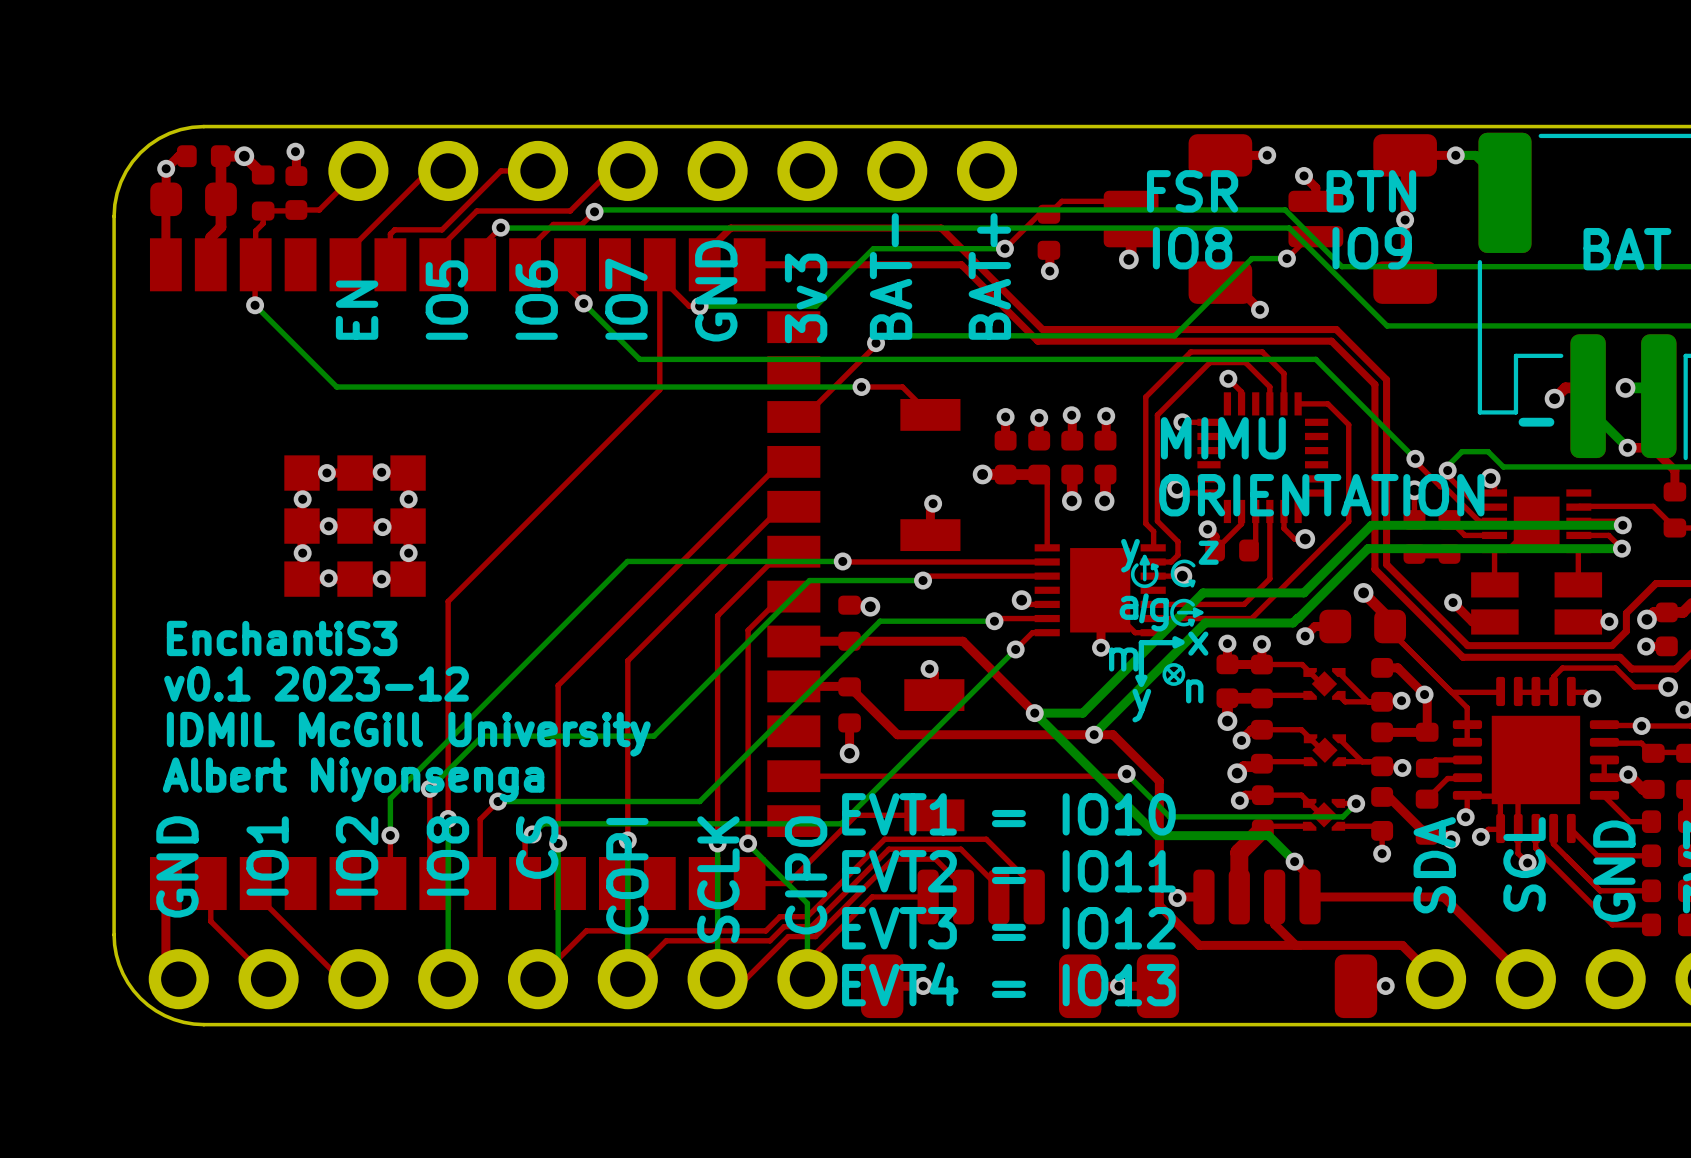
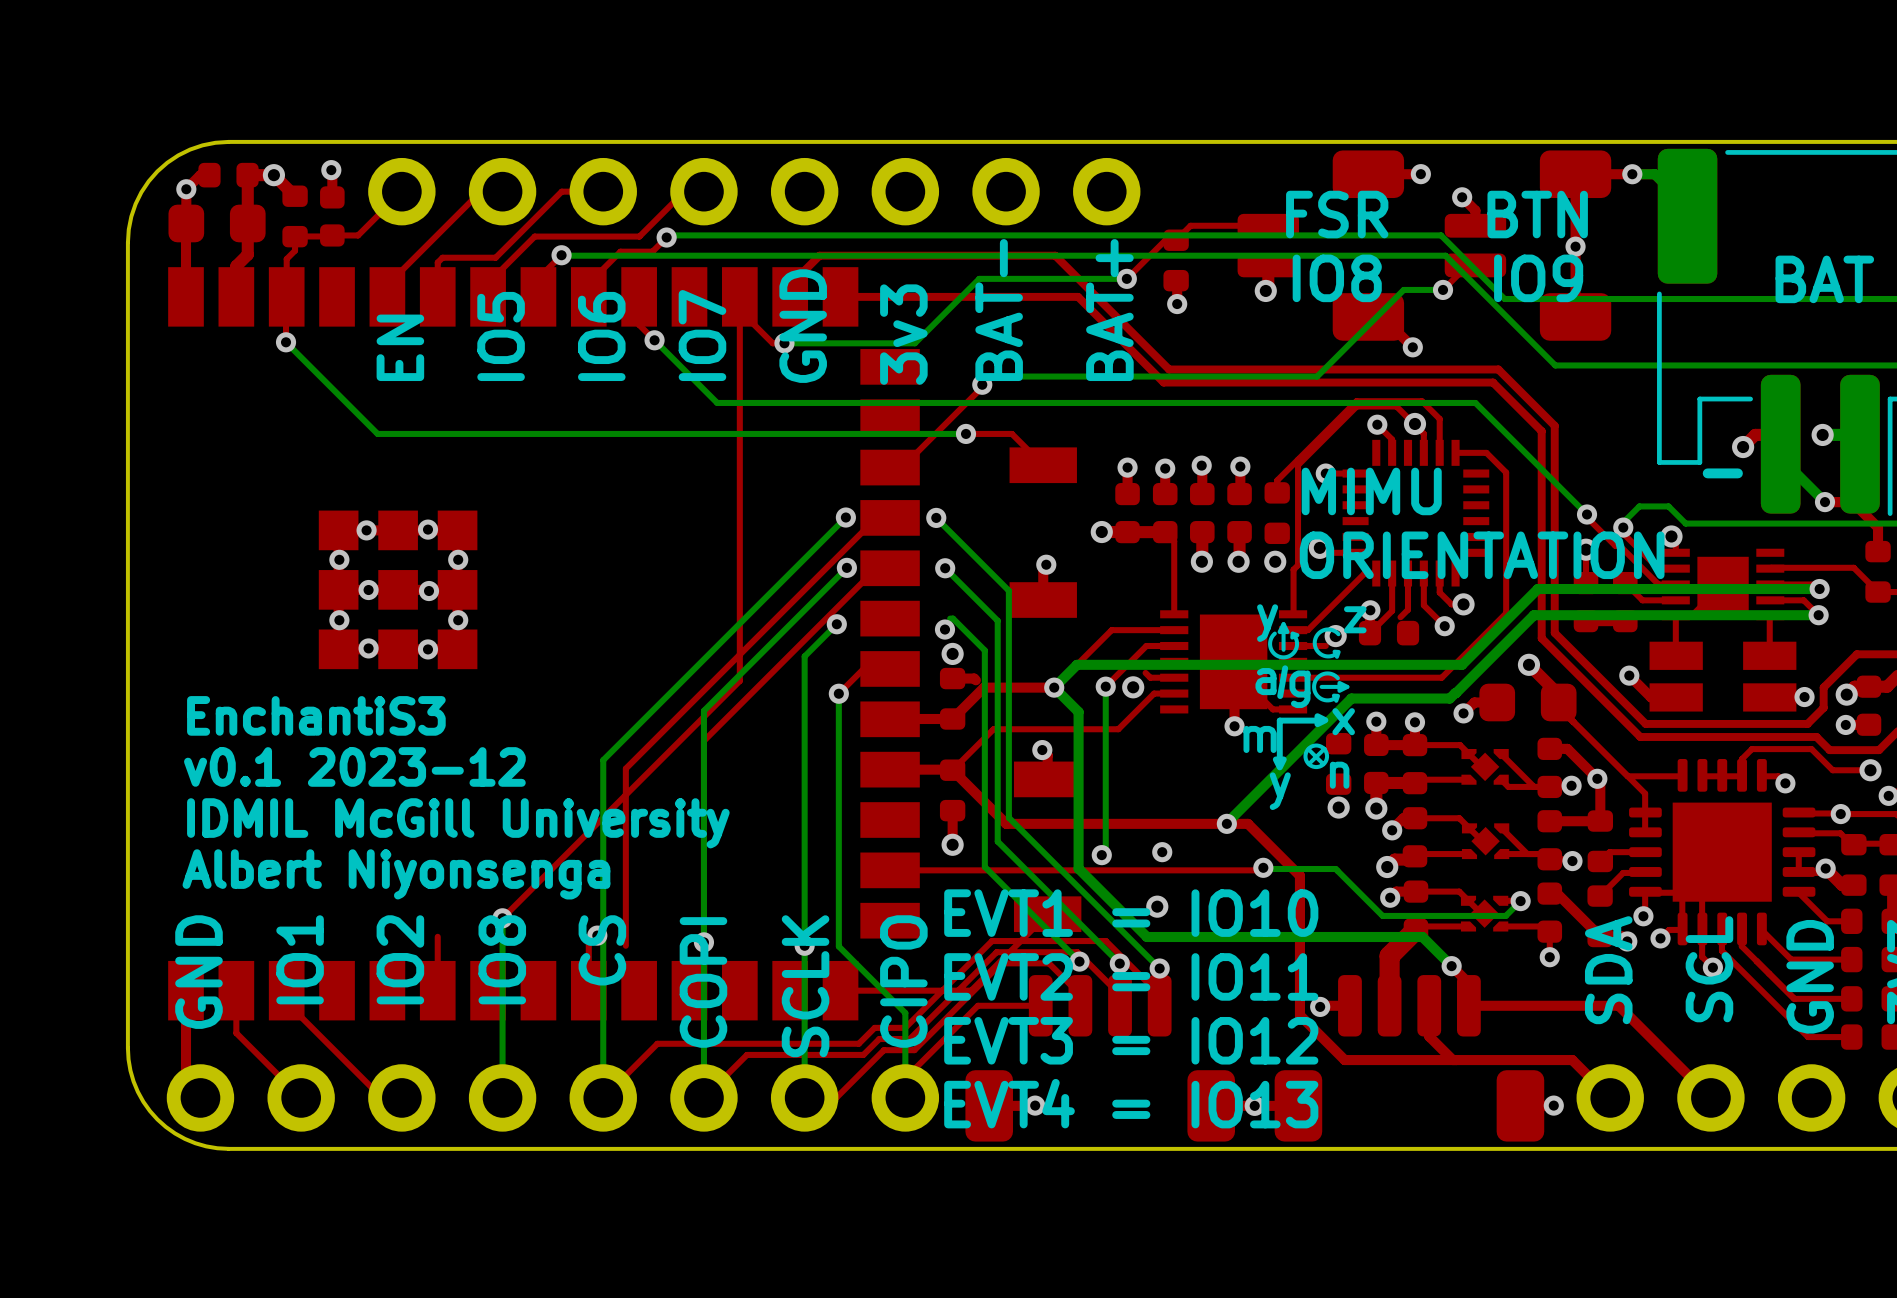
top track: (1268, 357) (1262, 351) (1190, 351) (1145, 397) (1145, 523) (1153, 531) -> (1421, 401) (1356, 401) (1277, 480) (1277, 492)
via: none -> (1414, 423)
top track: (659, 389) (448, 601) (448, 818) -> (739, 437) (739, 680) (502, 918)
top track: (1325, 403) (1348, 424) (1348, 521) (1251, 618) (1153, 618) -> (1486, 452) (1506, 472) (1506, 613) (1441, 677) (1395, 677)
part: none -> (1277, 513)
via: none -> (845, 517)
via: none -> (936, 517)
bottom track: none -> (936, 518) (1008, 590) (1008, 817) (1159, 968)
via: none -> (1275, 561)
top track: (1157, 504) (1157, 521) (1177, 541) (1177, 555) (1171, 561) (1166, 561) -> (1298, 565) (1293, 569) (1293, 595)
bottom track: none -> (846, 567) (703, 710) (703, 942)
via: none -> (846, 567)
bottom track: none -> (945, 568) (997, 620) (997, 841) (1119, 963)
via: none -> (945, 568)
top track: none -> (1376, 573) (1364, 573) (1307, 630)
top track: (1241, 524) (1215, 550) (1215, 536) (1207, 529) -> (1392, 587) (1392, 610) (1369, 633) (1369, 610)
via position: (1207, 529) -> (1370, 610)
top track: (1269, 539) (1269, 578) (1244, 604) -> (1423, 605) (1444, 626)
part position: (1232, 550) -> (1389, 633)
top track: (793, 551) (781, 551) (717, 615) (717, 843) -> none
bottom track: none -> (950, 618) (953, 618) (984, 650) (984, 866) (1079, 961)
bottom track: none -> (836, 624) (804, 656) (804, 945)
via: none -> (836, 624)
via: none -> (1444, 626)
top track: (842, 561) (991, 561) -> (952, 718) (984, 687) (1054, 687) (1111, 630)
bottom track: (842, 561) (627, 561) (390, 798) (390, 835) -> none
top track: (1022, 576) (927, 576) (923, 580) -> (1146, 646) (1105, 686)
via position: (1182, 576) -> (1335, 636)
bottom track: (923, 580) (809, 580) (653, 736) (482, 736) (429, 788) -> none
via: (923, 580) -> none
bottom track: (1203, 592) (1082, 713) (1034, 713) (1157, 835) -> (1348, 664) (1077, 664) (1054, 687) (1078, 711) (1078, 868) (1146, 936) (1297, 936)
top track: (781, 596) (748, 630) (748, 843) -> (876, 668) (863, 668) (838, 693)
via position: (1021, 600) -> (1133, 687)
via position: (870, 606) -> (952, 653)
bottom track: none -> (1105, 686) (1105, 851) (1101, 855)
via: none -> (1054, 687)
bottom track: none -> (838, 693) (838, 945)
via: none -> (838, 693)
top track: (1029, 618) (997, 618) (994, 621) -> (1154, 693) (1118, 729) (993, 729) (952, 770)
bottom track: (994, 621) (880, 621) (699, 801) (498, 801) -> none
via position: (994, 621) -> (1105, 686)
top track: (1047, 632) (1032, 632) (1015, 649) -> none
top track: (849, 641) (962, 641) (1034, 713) -> none
bottom track: (1015, 649) (841, 823) (543, 823) (532, 834) -> none
via: (1015, 649) -> none
part: none -> (1338, 763)
via: (1034, 713) -> none
via: none -> (1338, 807)
via: none -> (1162, 852)
via: none -> (1101, 855)
bottom track: (1126, 773) (1169, 816) (1233, 816) -> (1262, 869) (1335, 869) (1382, 915)
top track: (429, 788) (429, 878) (435, 883) -> none
via: (429, 788) -> none
top track: (498, 801) (480, 819) (480, 883) -> none
via: (498, 801) -> none
via: none -> (1157, 906)
top track: (934, 815) (856, 815) (788, 883) -> (1047, 914) (971, 990) (883, 990)
via: (390, 835) -> none
bottom track: (558, 843) (558, 959) (538, 979) -> (845, 517) (603, 760) (603, 1097)
via: (558, 843) -> none
via: (748, 843) -> none
via: none -> (1079, 961)
via: none -> (1119, 963)
via: none -> (1159, 968)

